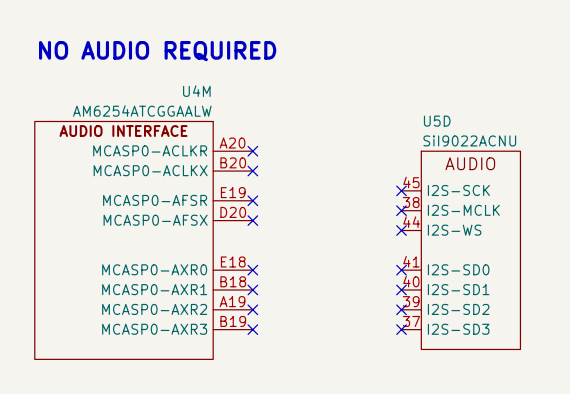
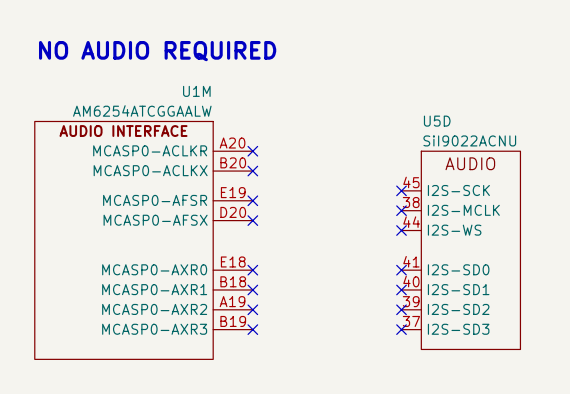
U4M name: U4M (196, 91) -> U1M (196, 91)

